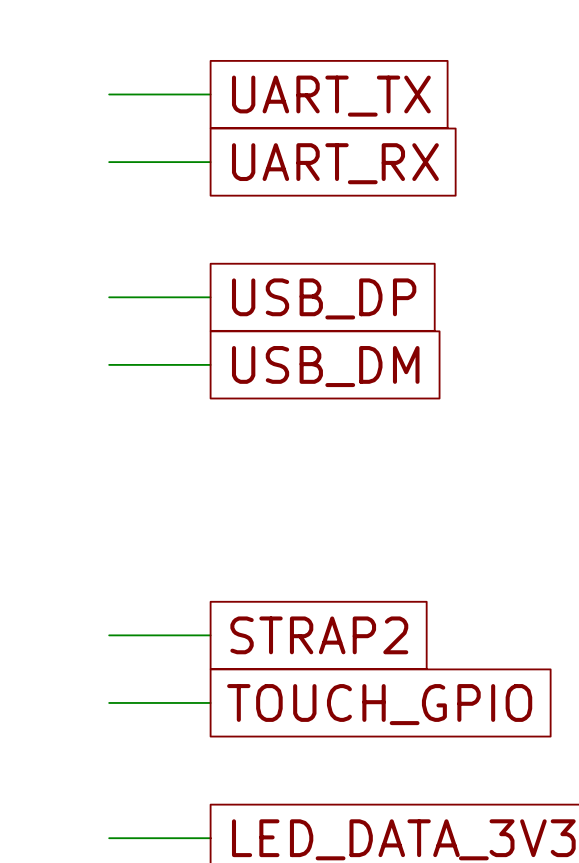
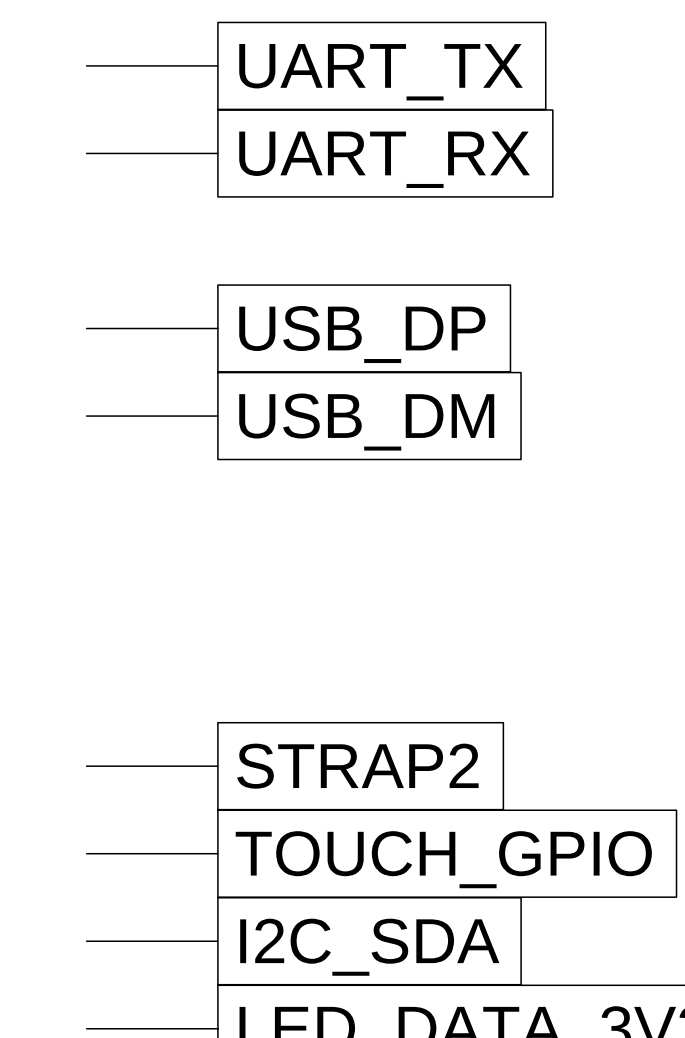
wire: none -> (86, 941) (217, 941)
global label: none -> I2C_SDA (369, 947)

